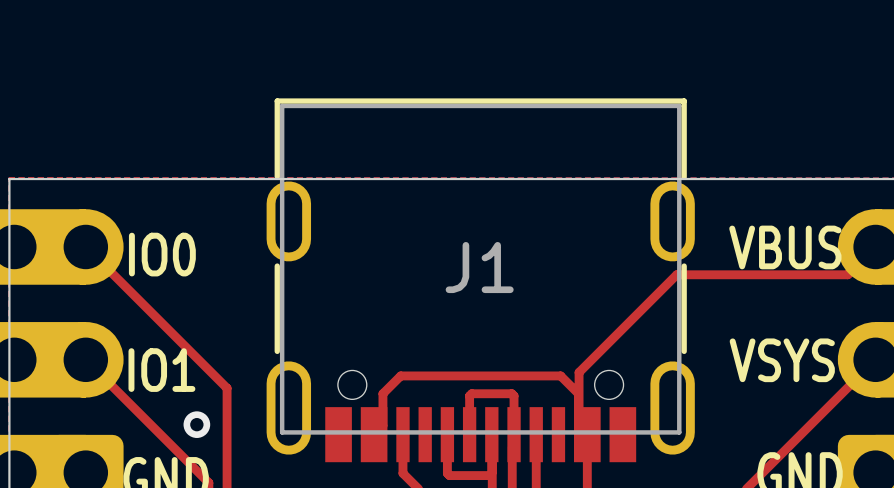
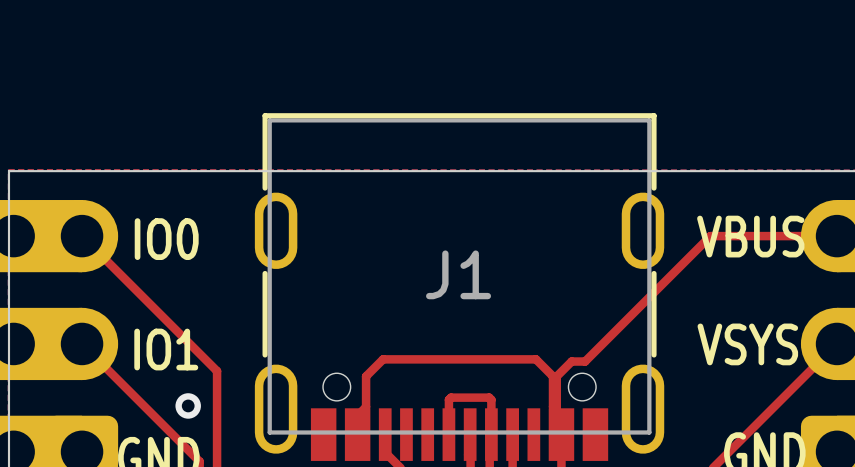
top track: (875, 246) (847, 274) (676, 274) (579, 372) (579, 426) -> (837, 236) (710, 236) (585, 361) (571, 361) (556, 376) (556, 429) (561, 434)
text position: IO0 (162, 254) -> IO0 (166, 239)
J1 position: (480, 280) -> (459, 287)
text position: IO1 (161, 370) -> IO1 (166, 349)
top track: (469, 418) (469, 395) (471, 393) (511, 393) (514, 395) (514, 418) -> (448, 399) (451, 397) (489, 397) (491, 399)
top track: (449, 475) (489, 475) -> none

